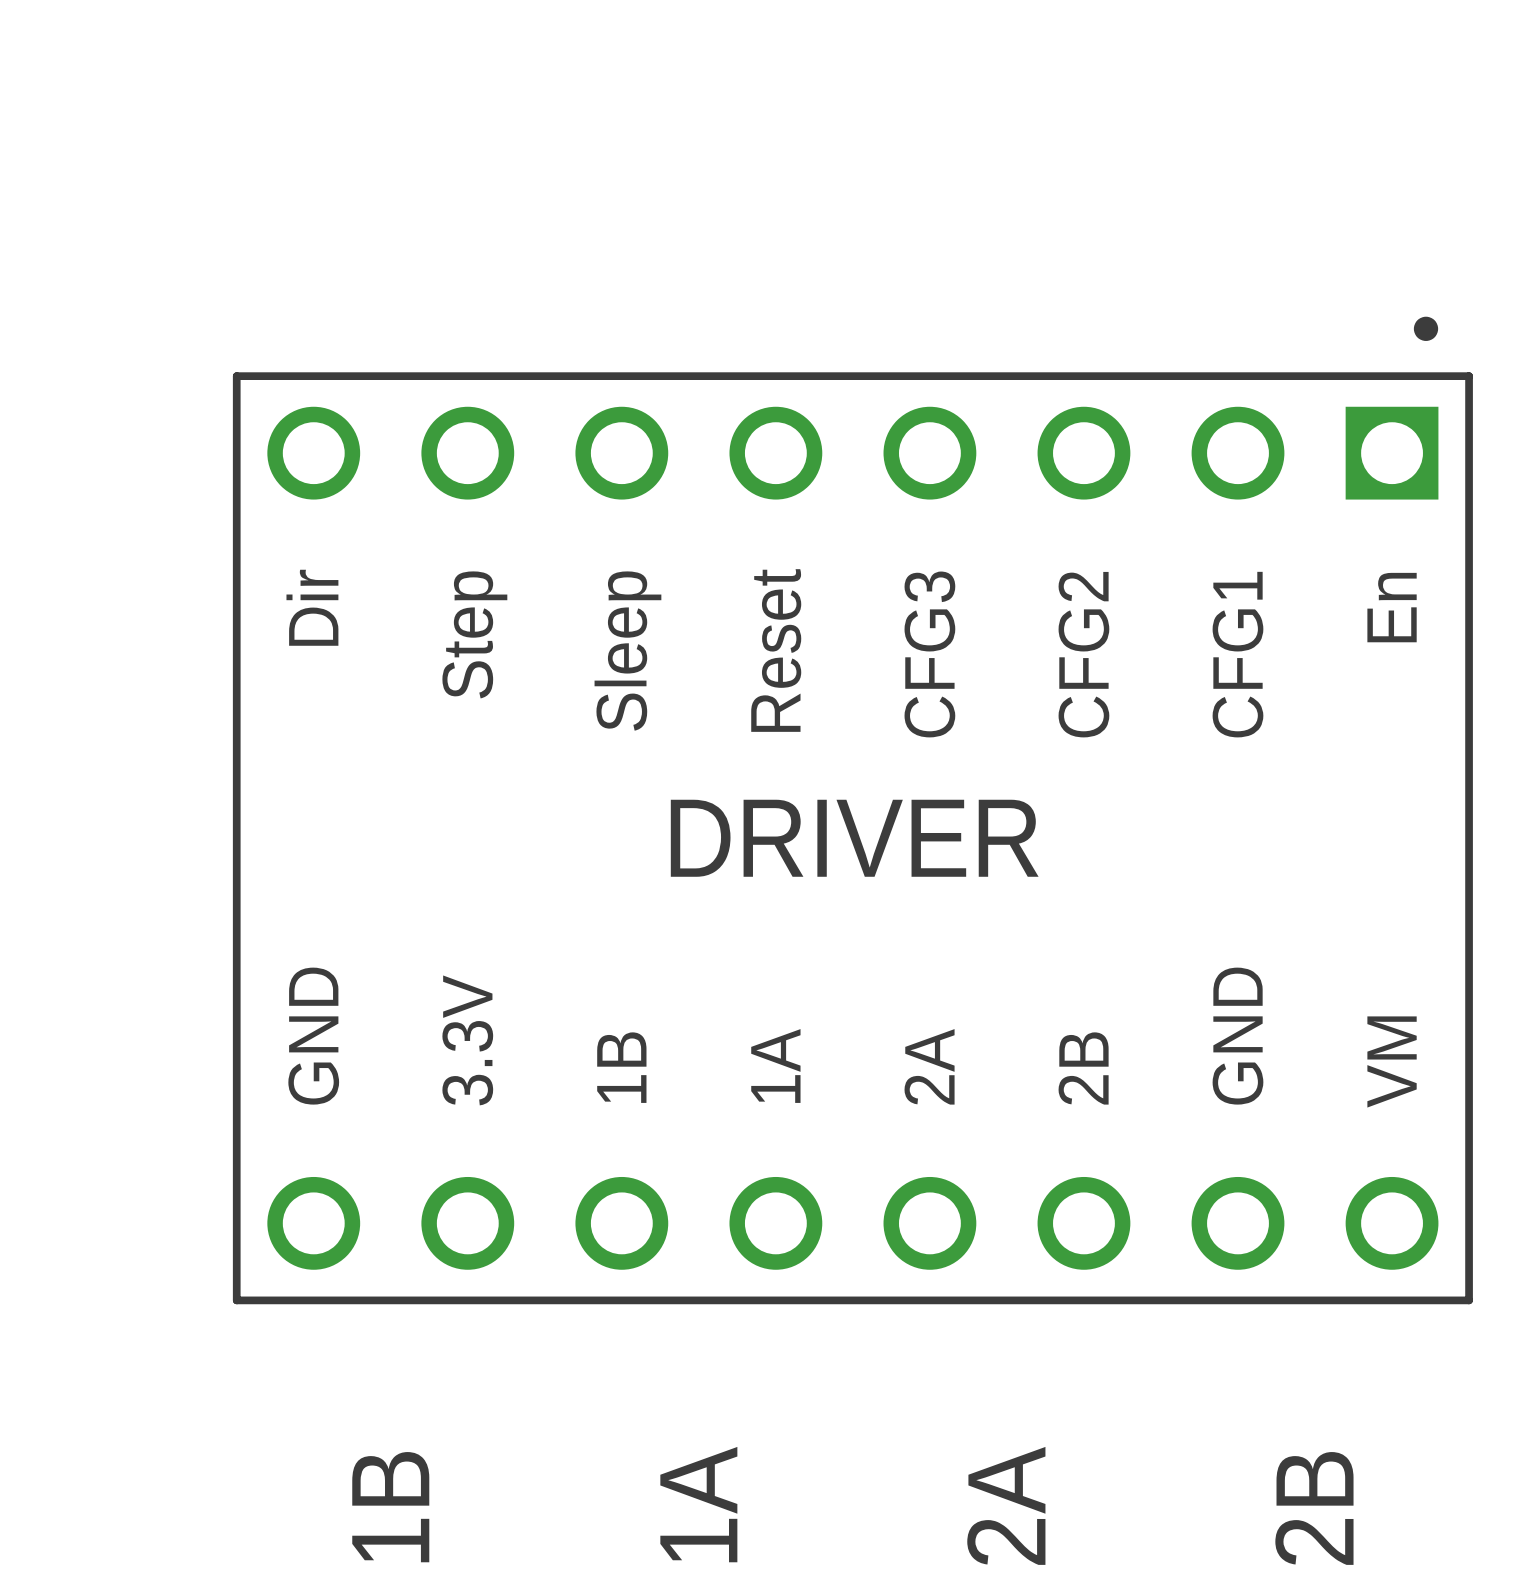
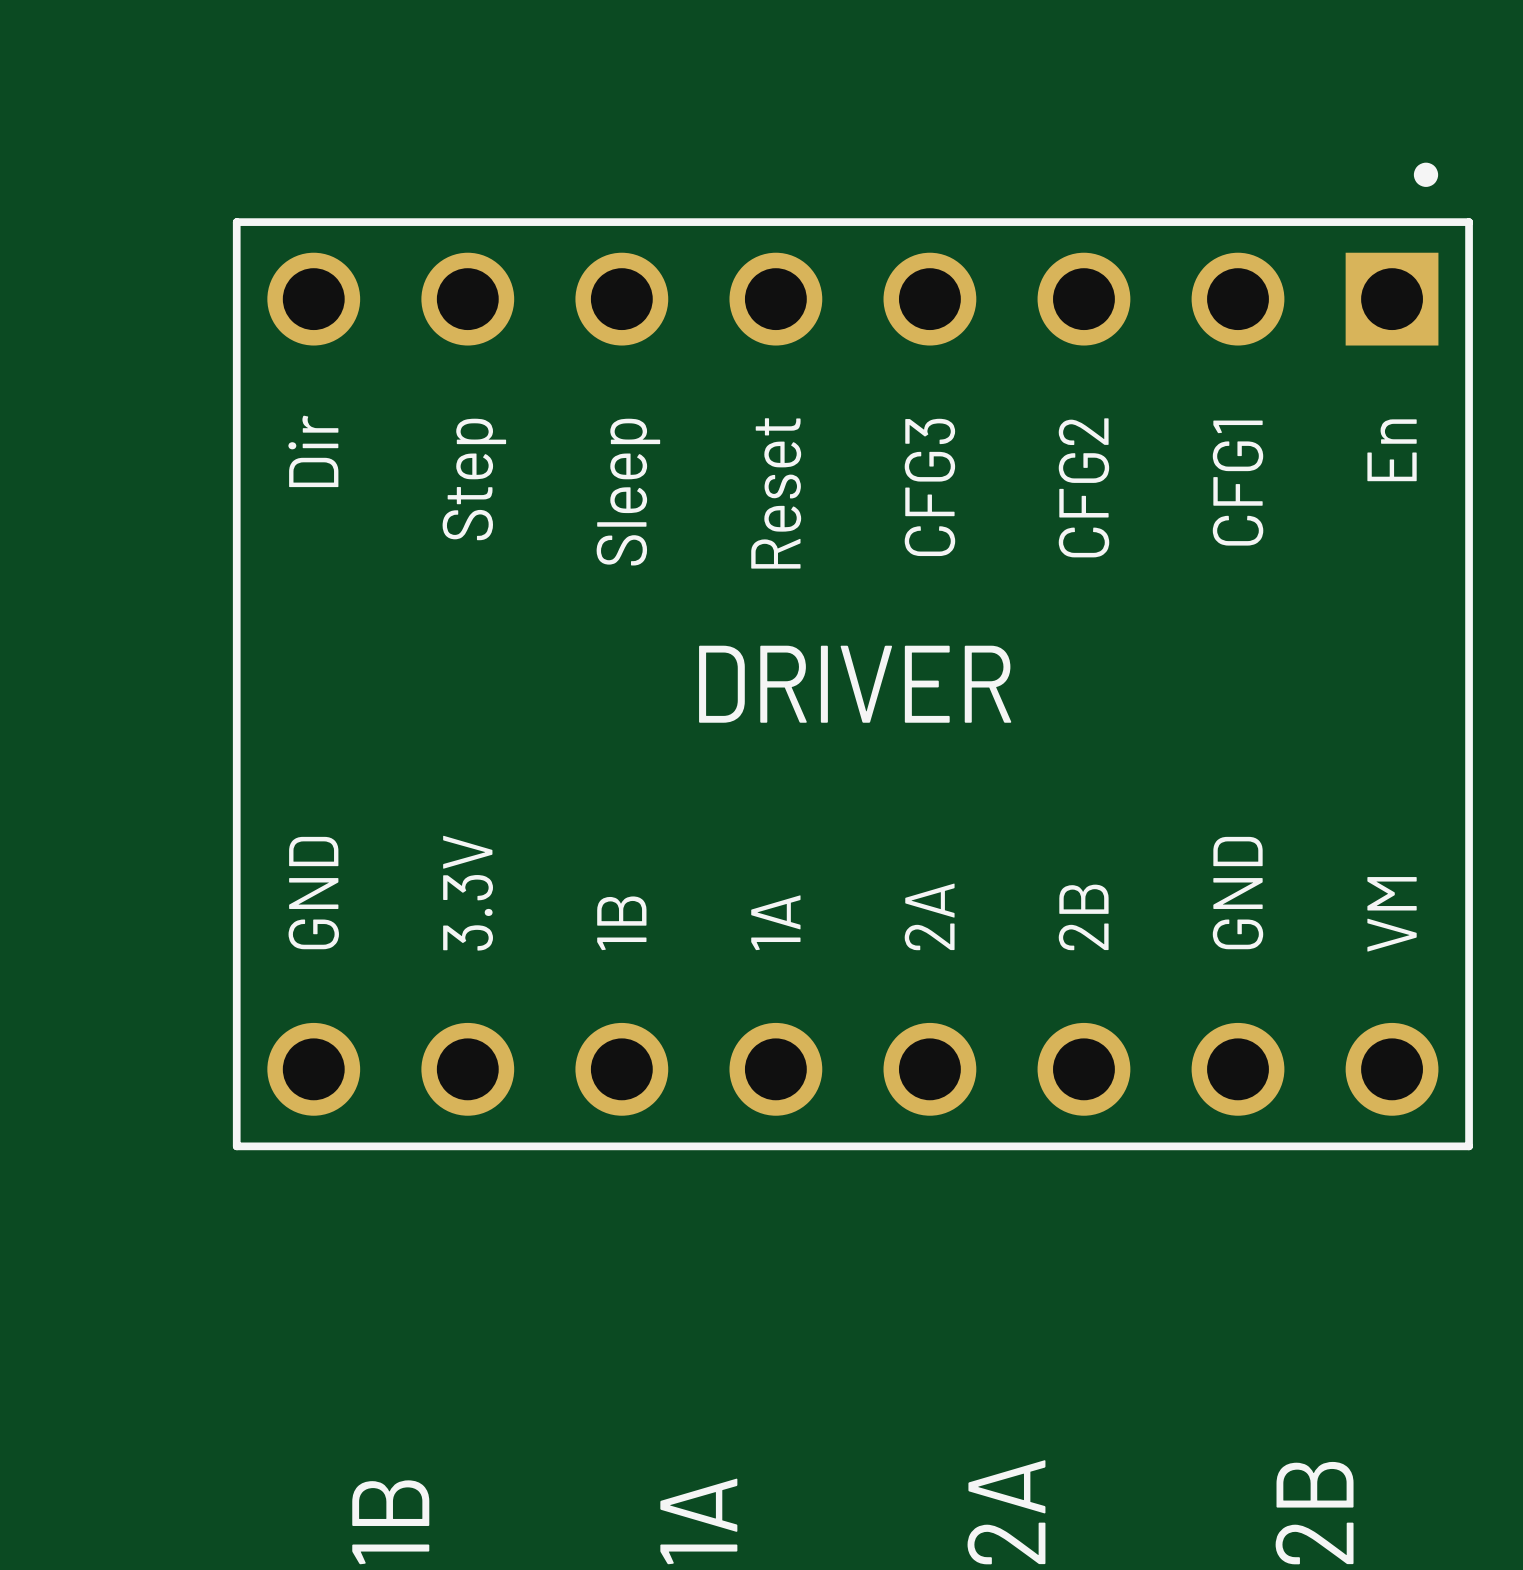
text position: Dir (312, 607) -> Dir (313, 451)
text position: En (1392, 607) -> En (1392, 450)
text position: Step (474, 634) -> Step (474, 479)
text position: Reset (776, 650) -> Reset (776, 493)
text position: Sleep (627, 651) -> Sleep (628, 492)
text position: CFG3 (929, 654) -> CFG3 (929, 487)
text position: CFG2 (1083, 654) -> CFG2 (1083, 487)
text position: CFG1 (1237, 654) -> CFG1 (1238, 483)
DRIVER position: (852, 810) -> (852, 656)
text position: GND (313, 1036) -> GND (313, 893)
text position: GND (1237, 1036) -> GND (1238, 893)
text position: 3.3V (467, 1040) -> 3.3V (468, 893)
text position: VM (1392, 1061) -> VM (1392, 914)
text position: 1A (775, 1066) -> 1A (775, 922)
text position: 2A (929, 1066) -> 2A (929, 916)
text position: 1B (621, 1067) -> 1B (621, 923)
text position: 2B (1083, 1068) -> 2B (1083, 917)

